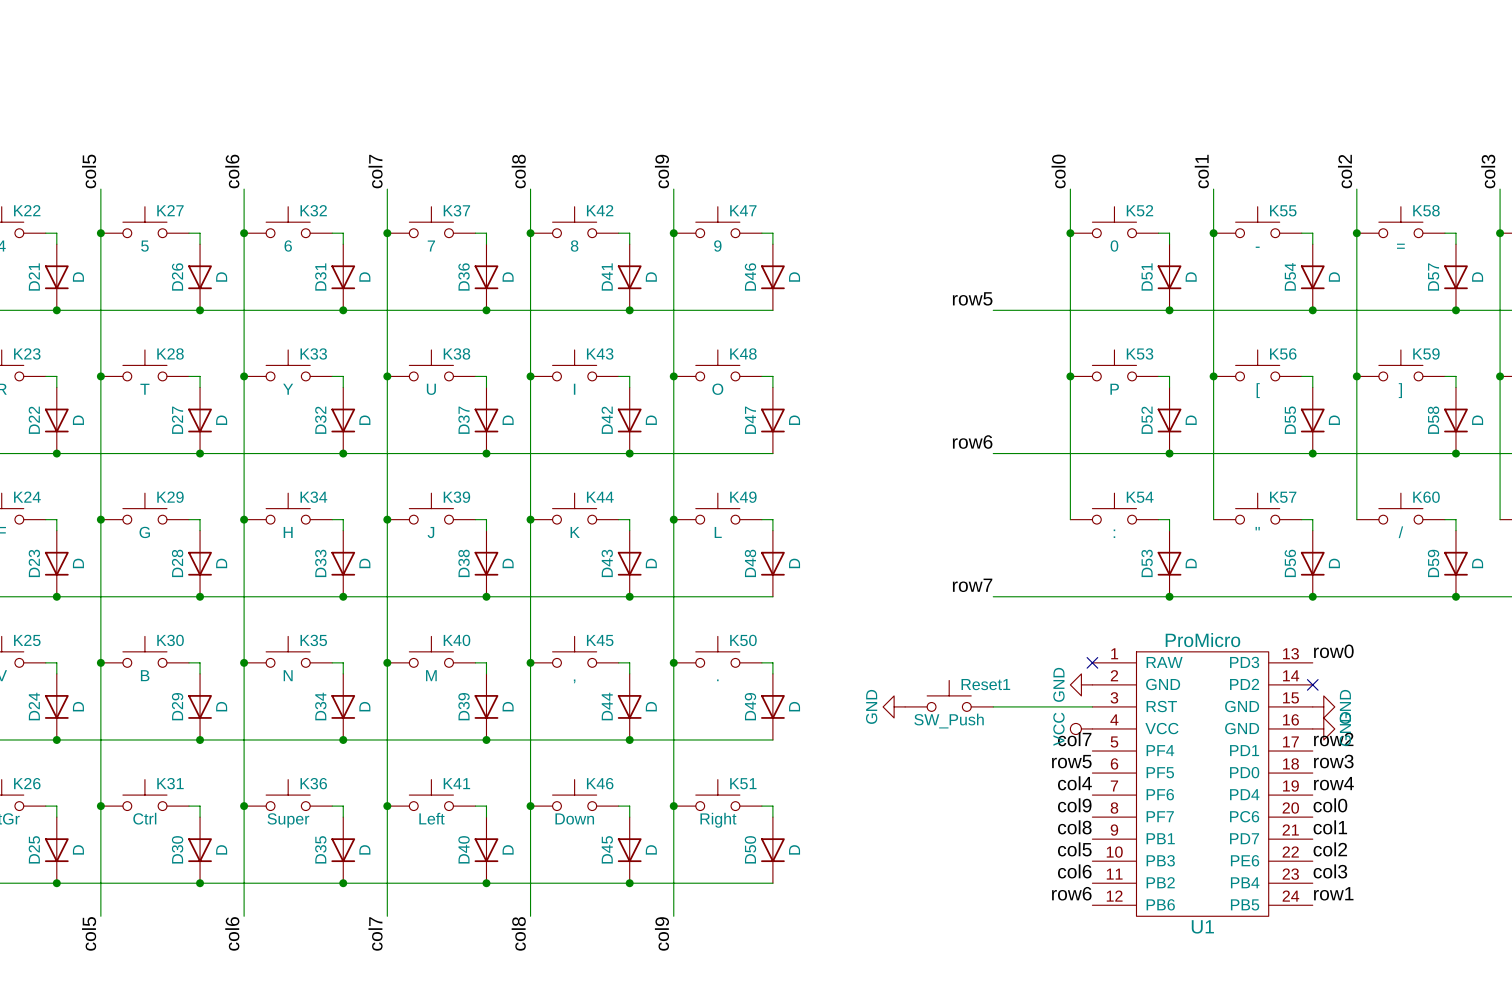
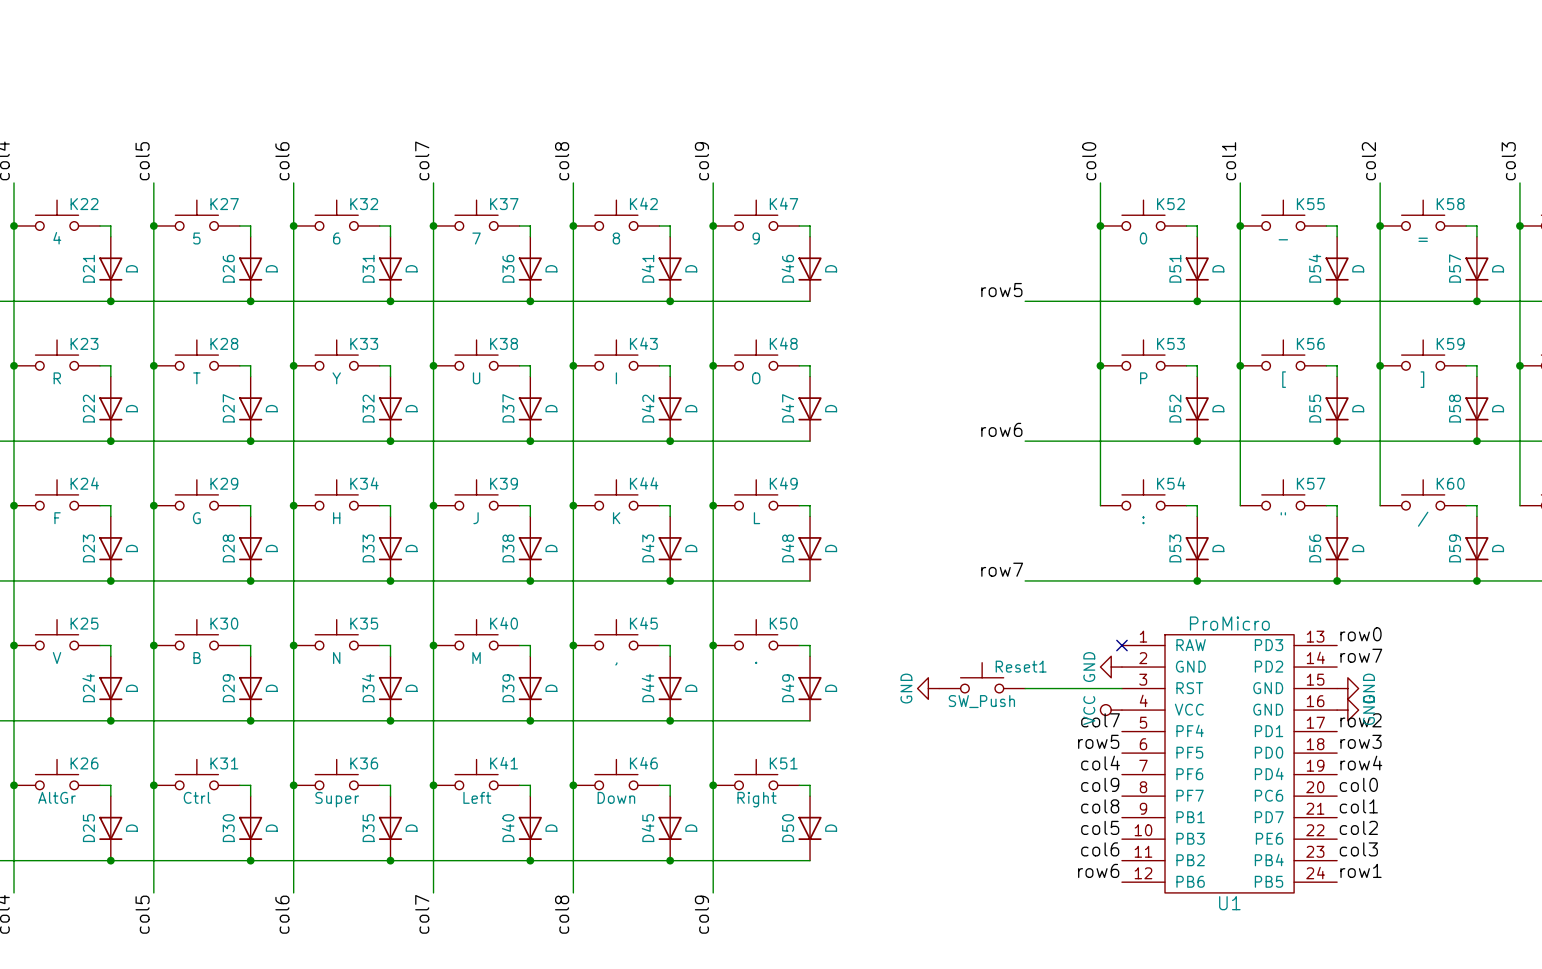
label: none -> row7 (1361, 655)
no-connect mark: (1312, 684) -> none

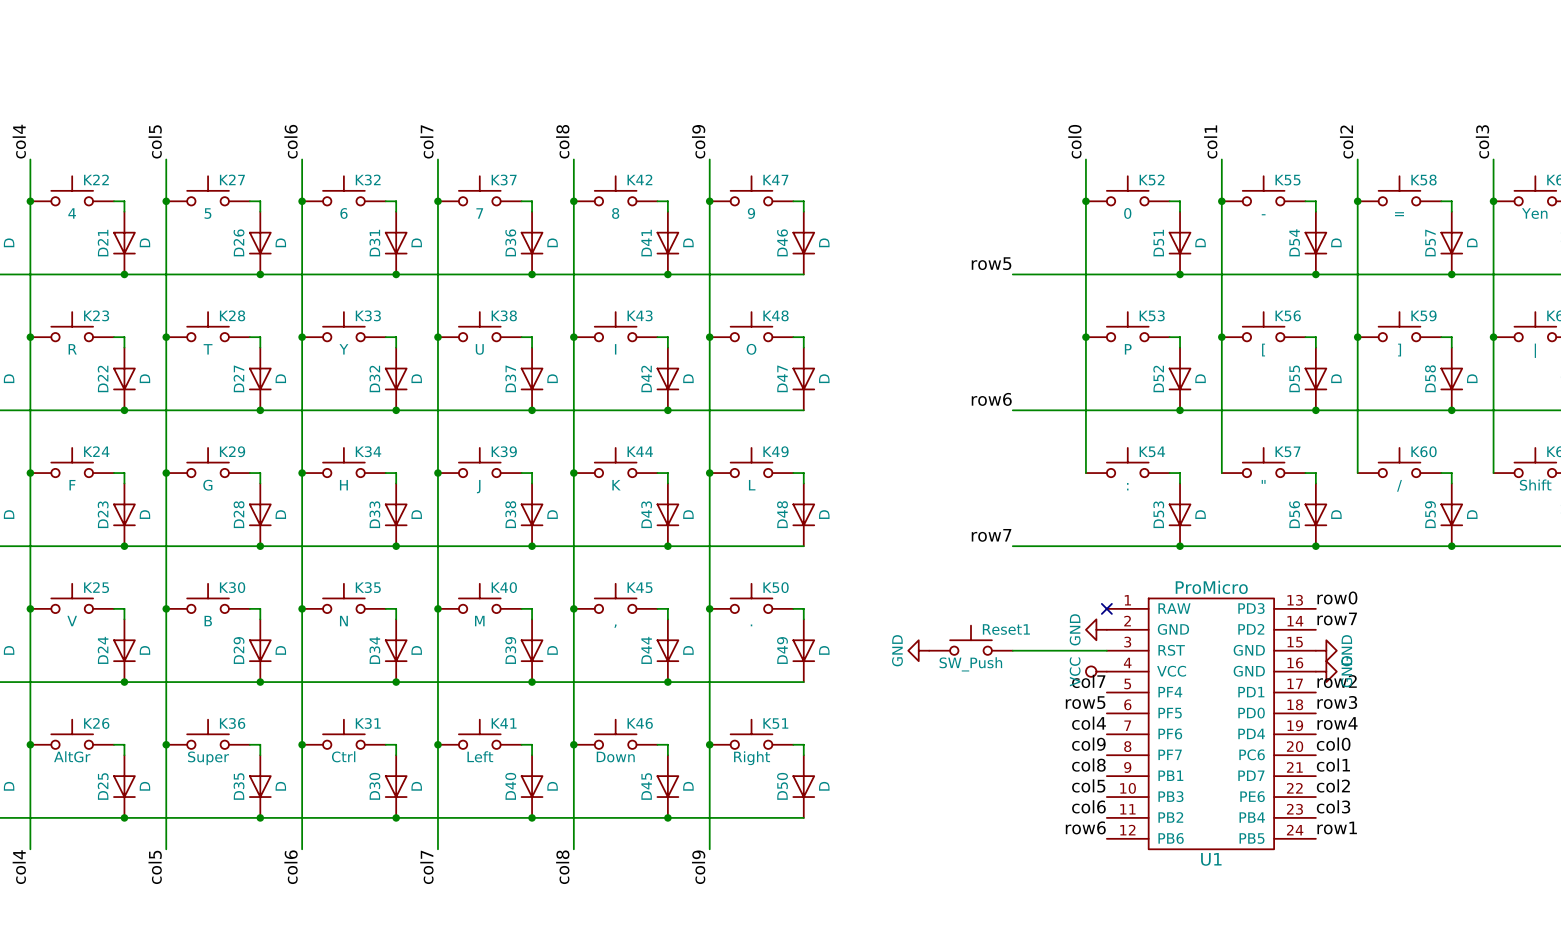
K31 name: K31 (224, 763) -> K36 (232, 723)
K36 name: K36 (364, 763) -> K31 (368, 723)
K31 value: Ctrl (197, 797) -> Super (208, 758)
K36 value: Super (337, 799) -> Ctrl (343, 756)
D30 name: D30 (228, 828) -> D35 (239, 786)
D35 name: D35 (368, 828) -> D30 (374, 786)

